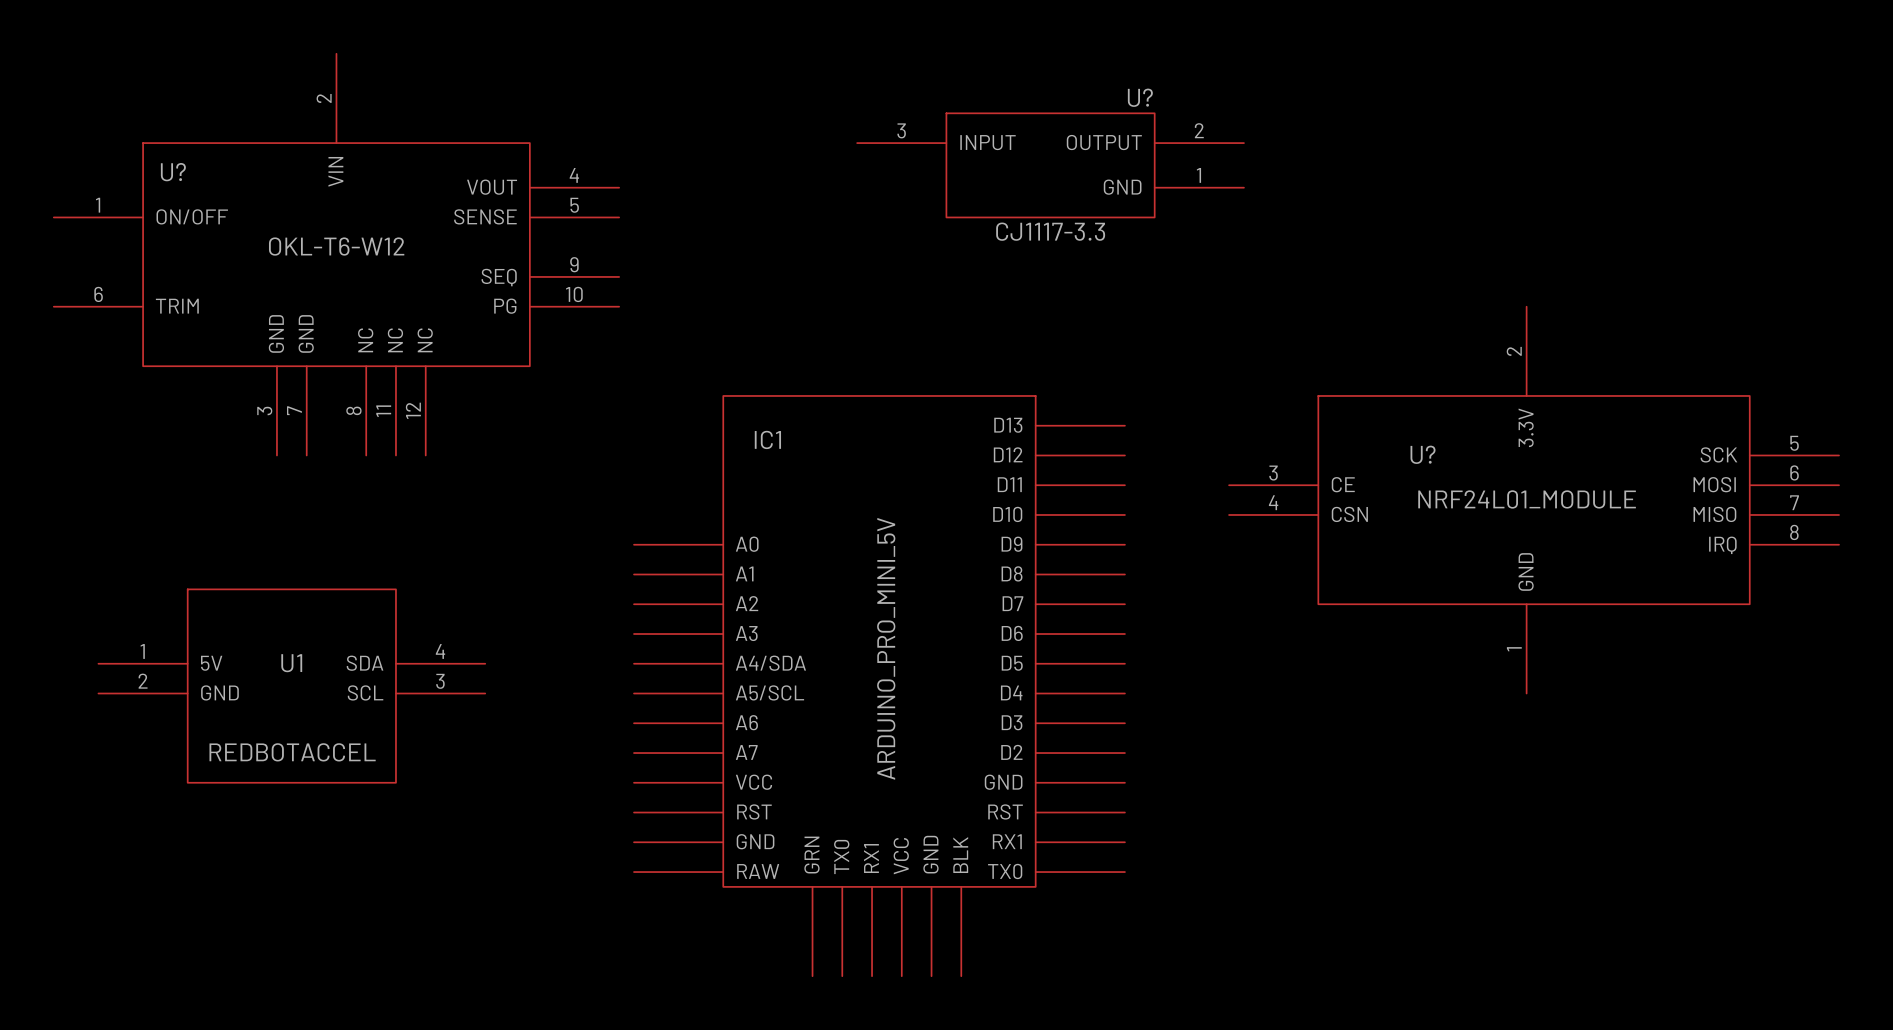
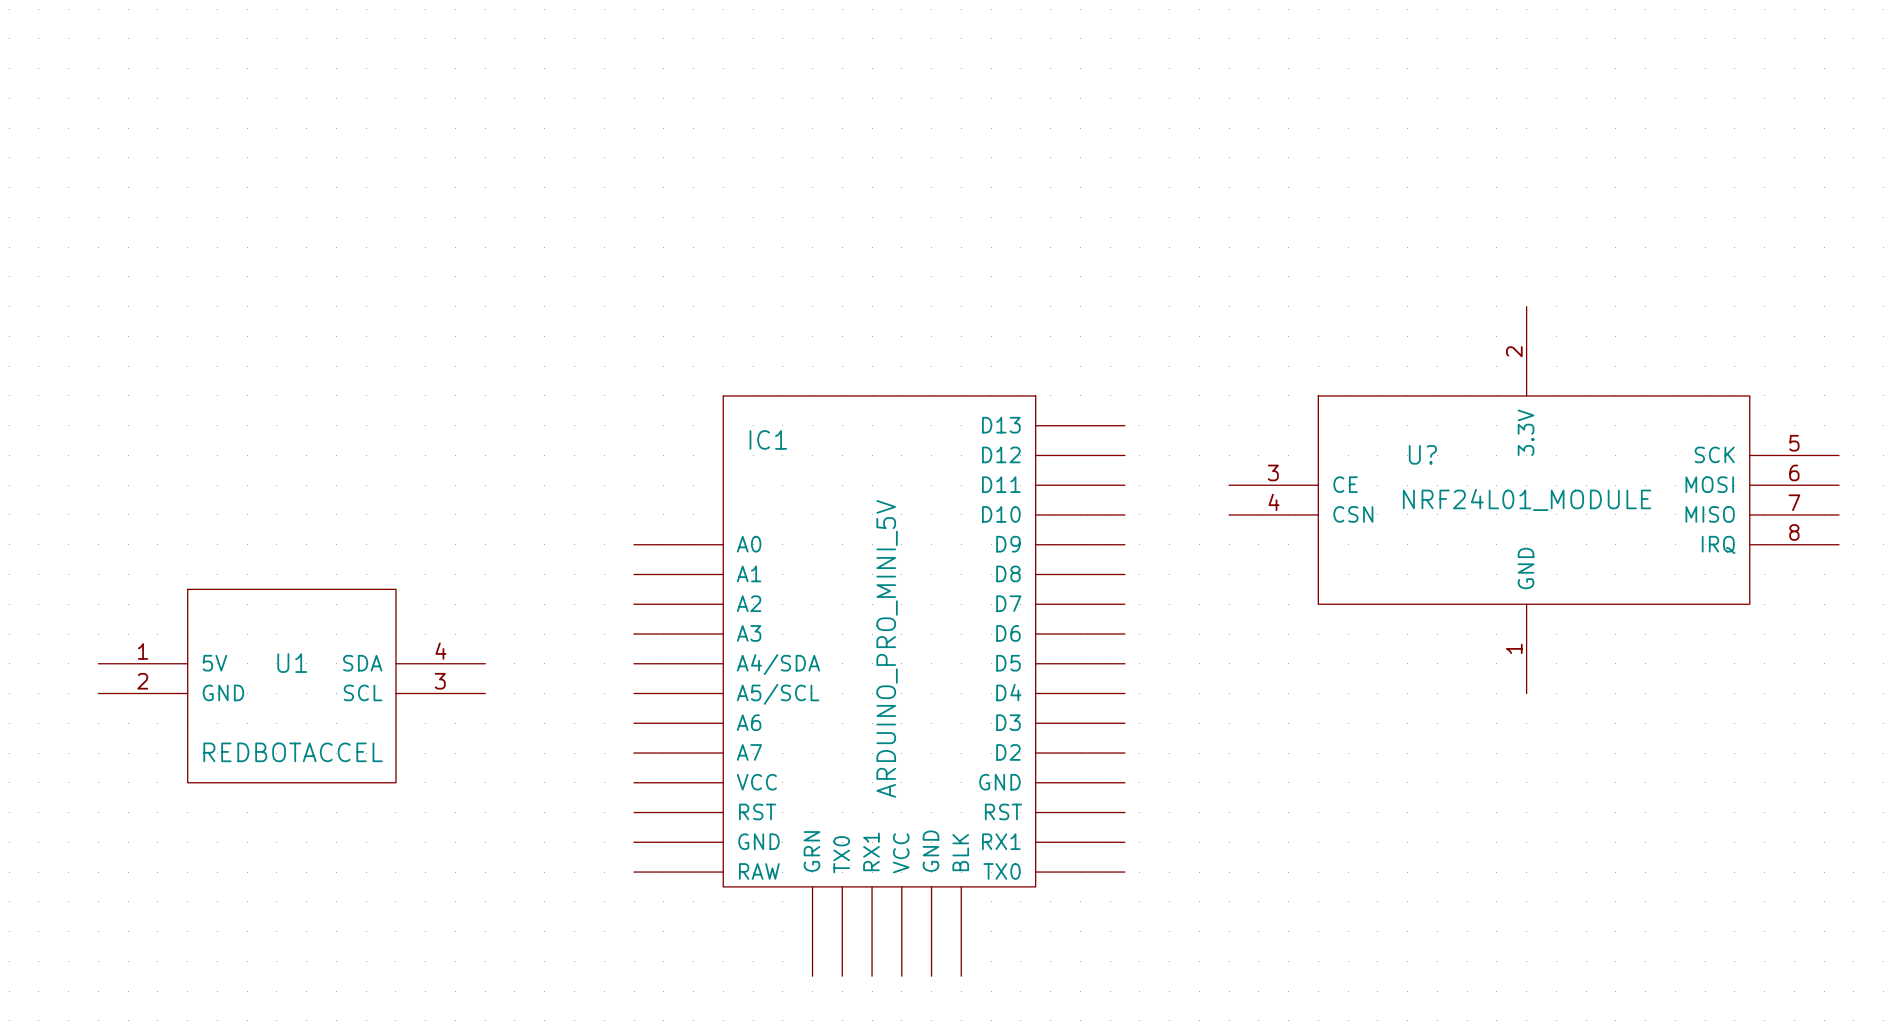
U?: CJ1117-3.3 (1050, 165) -> none
U?: OKL-T6-W12 (336, 254) -> none

